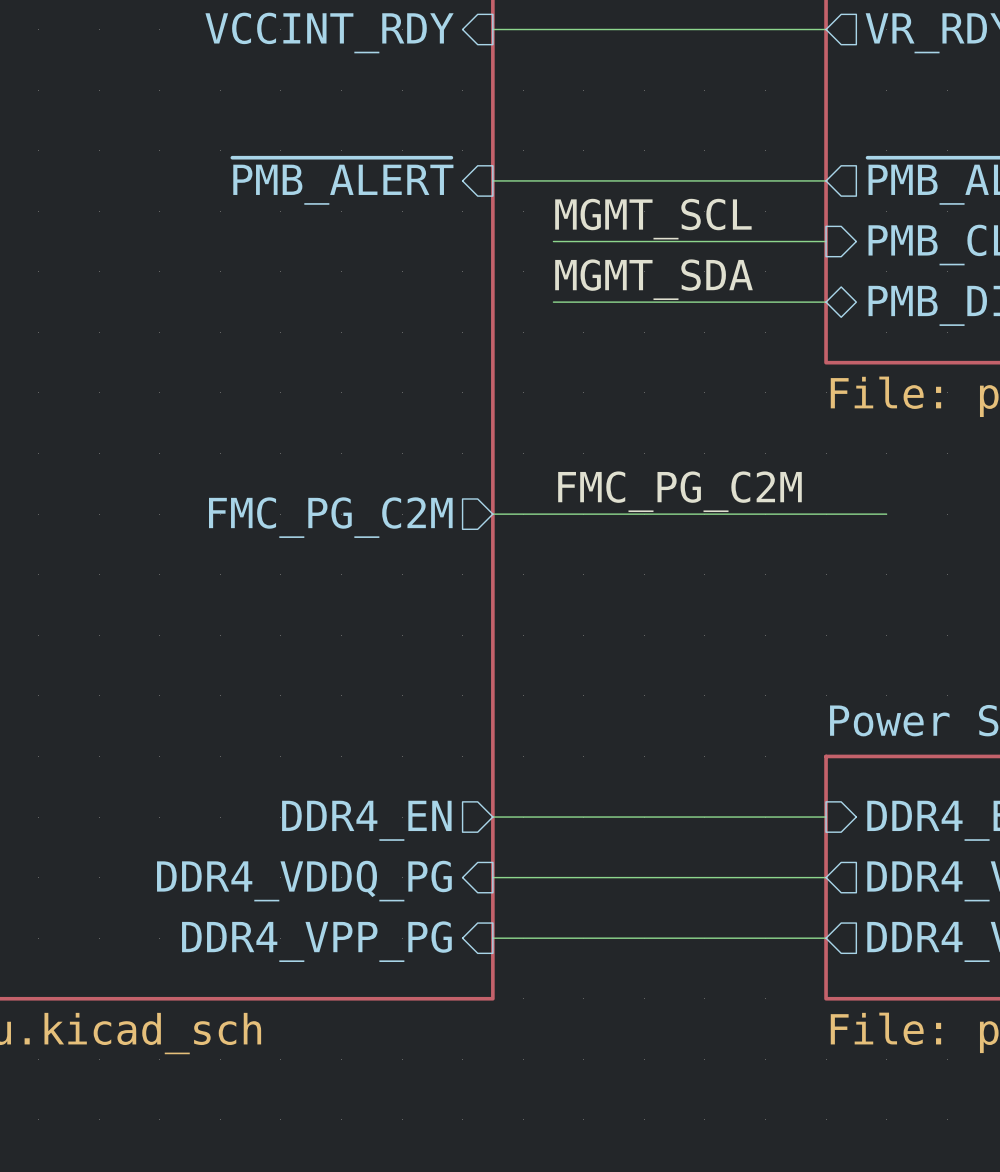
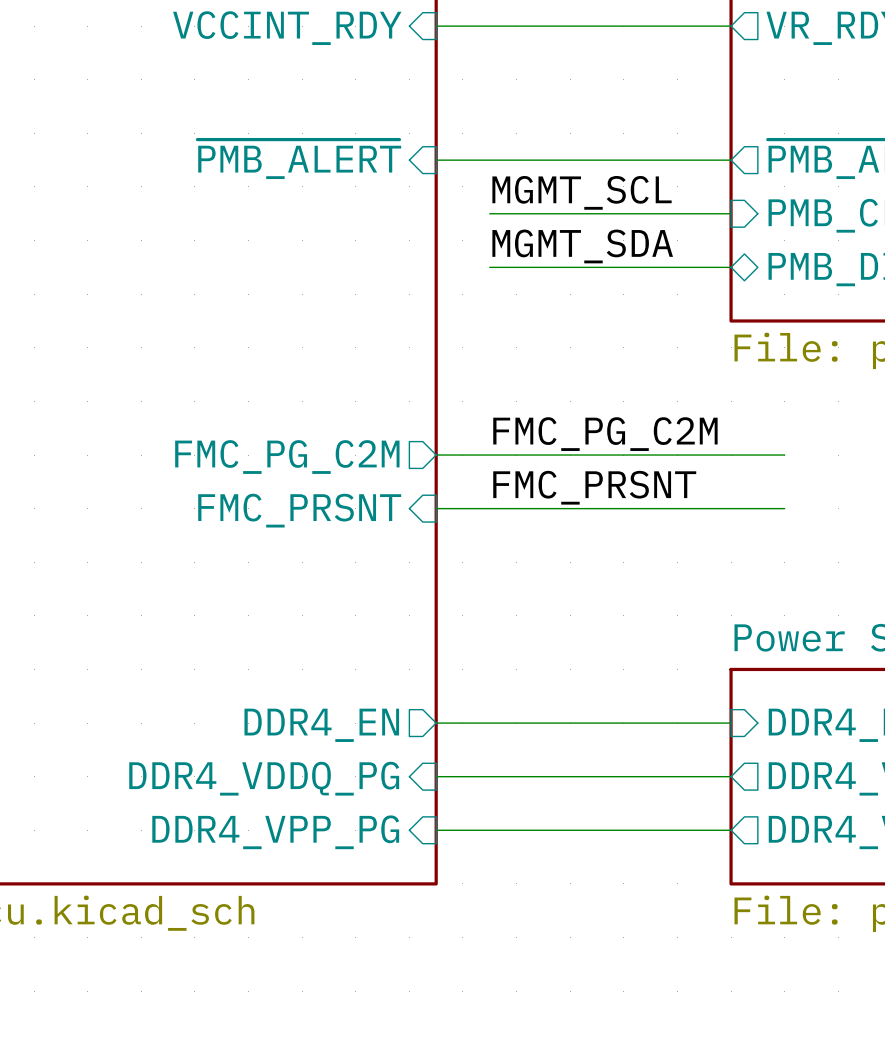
label: none -> FMC_PRSNT (594, 487)
wire: none -> (436, 508) (784, 508)
sheet pin: none -> FMC_PRSNT (299, 510)

